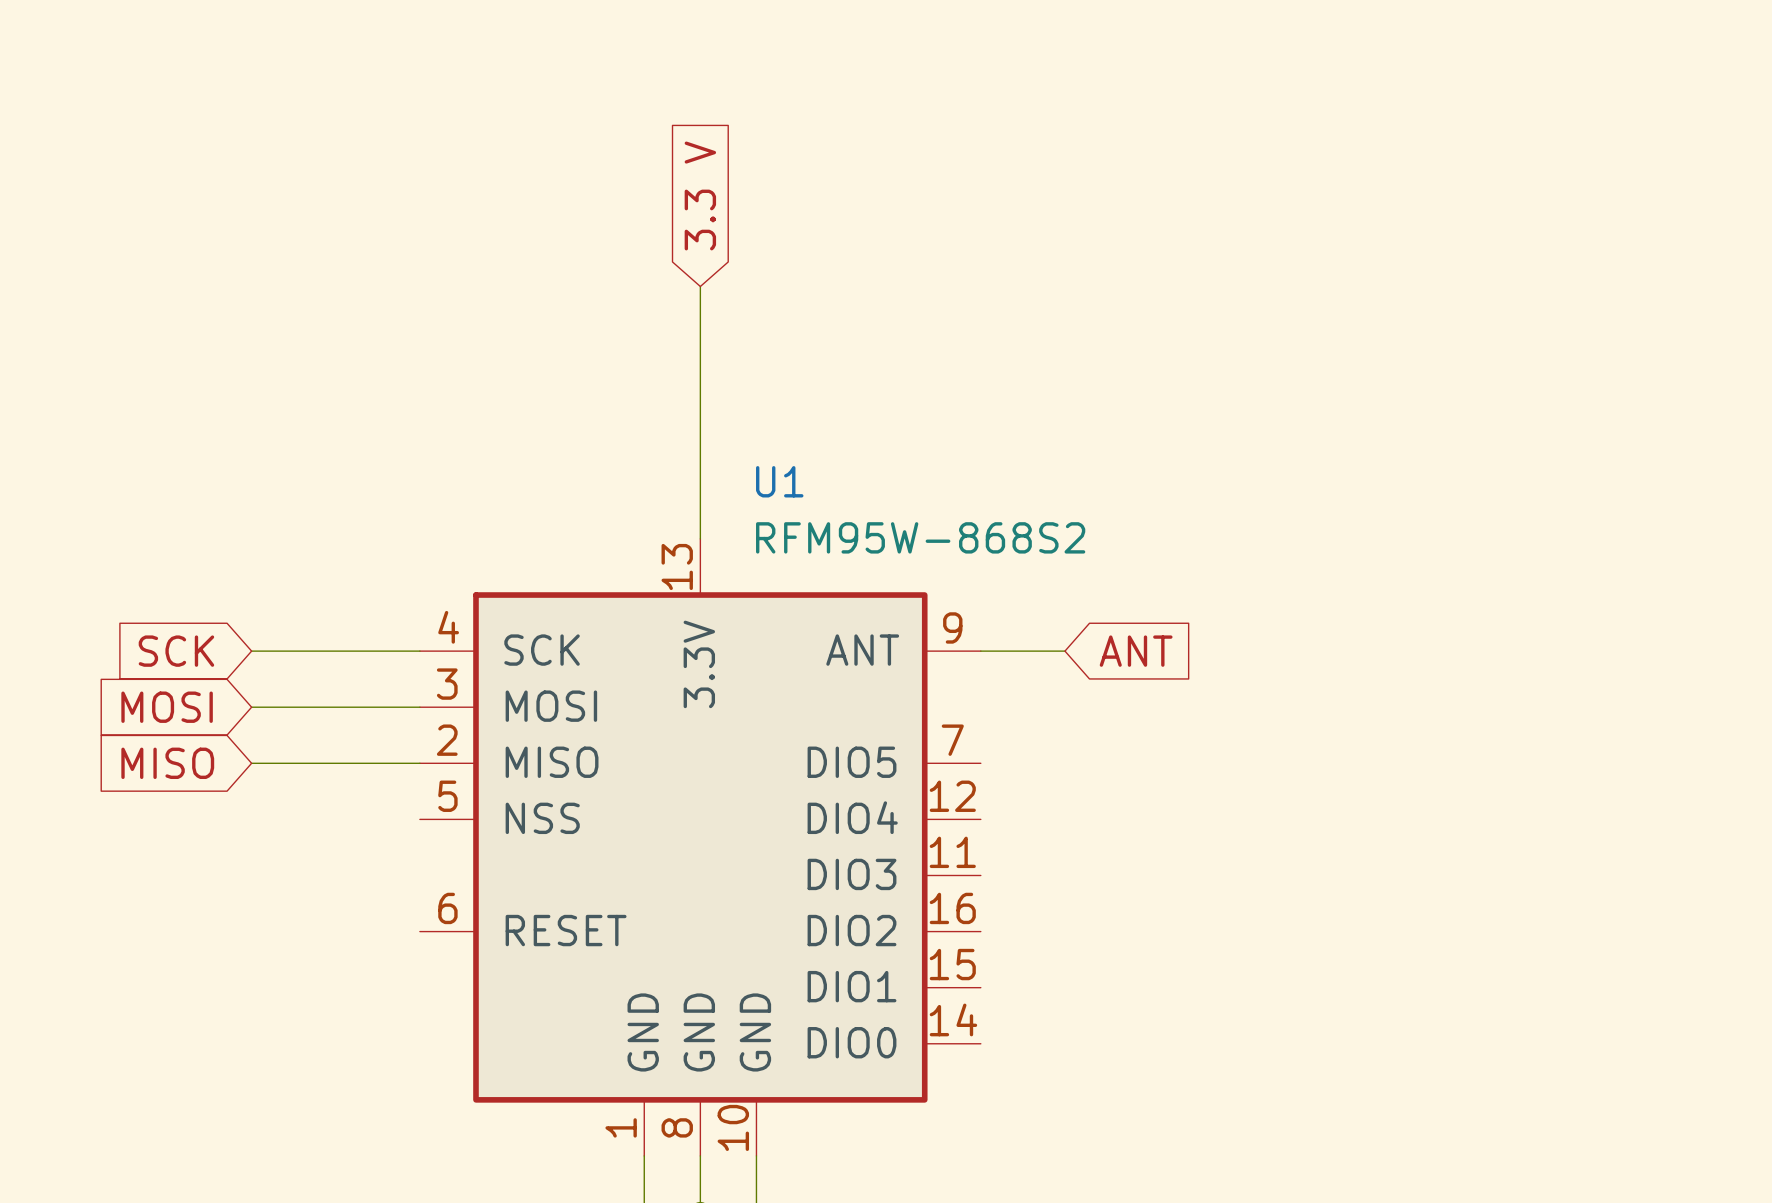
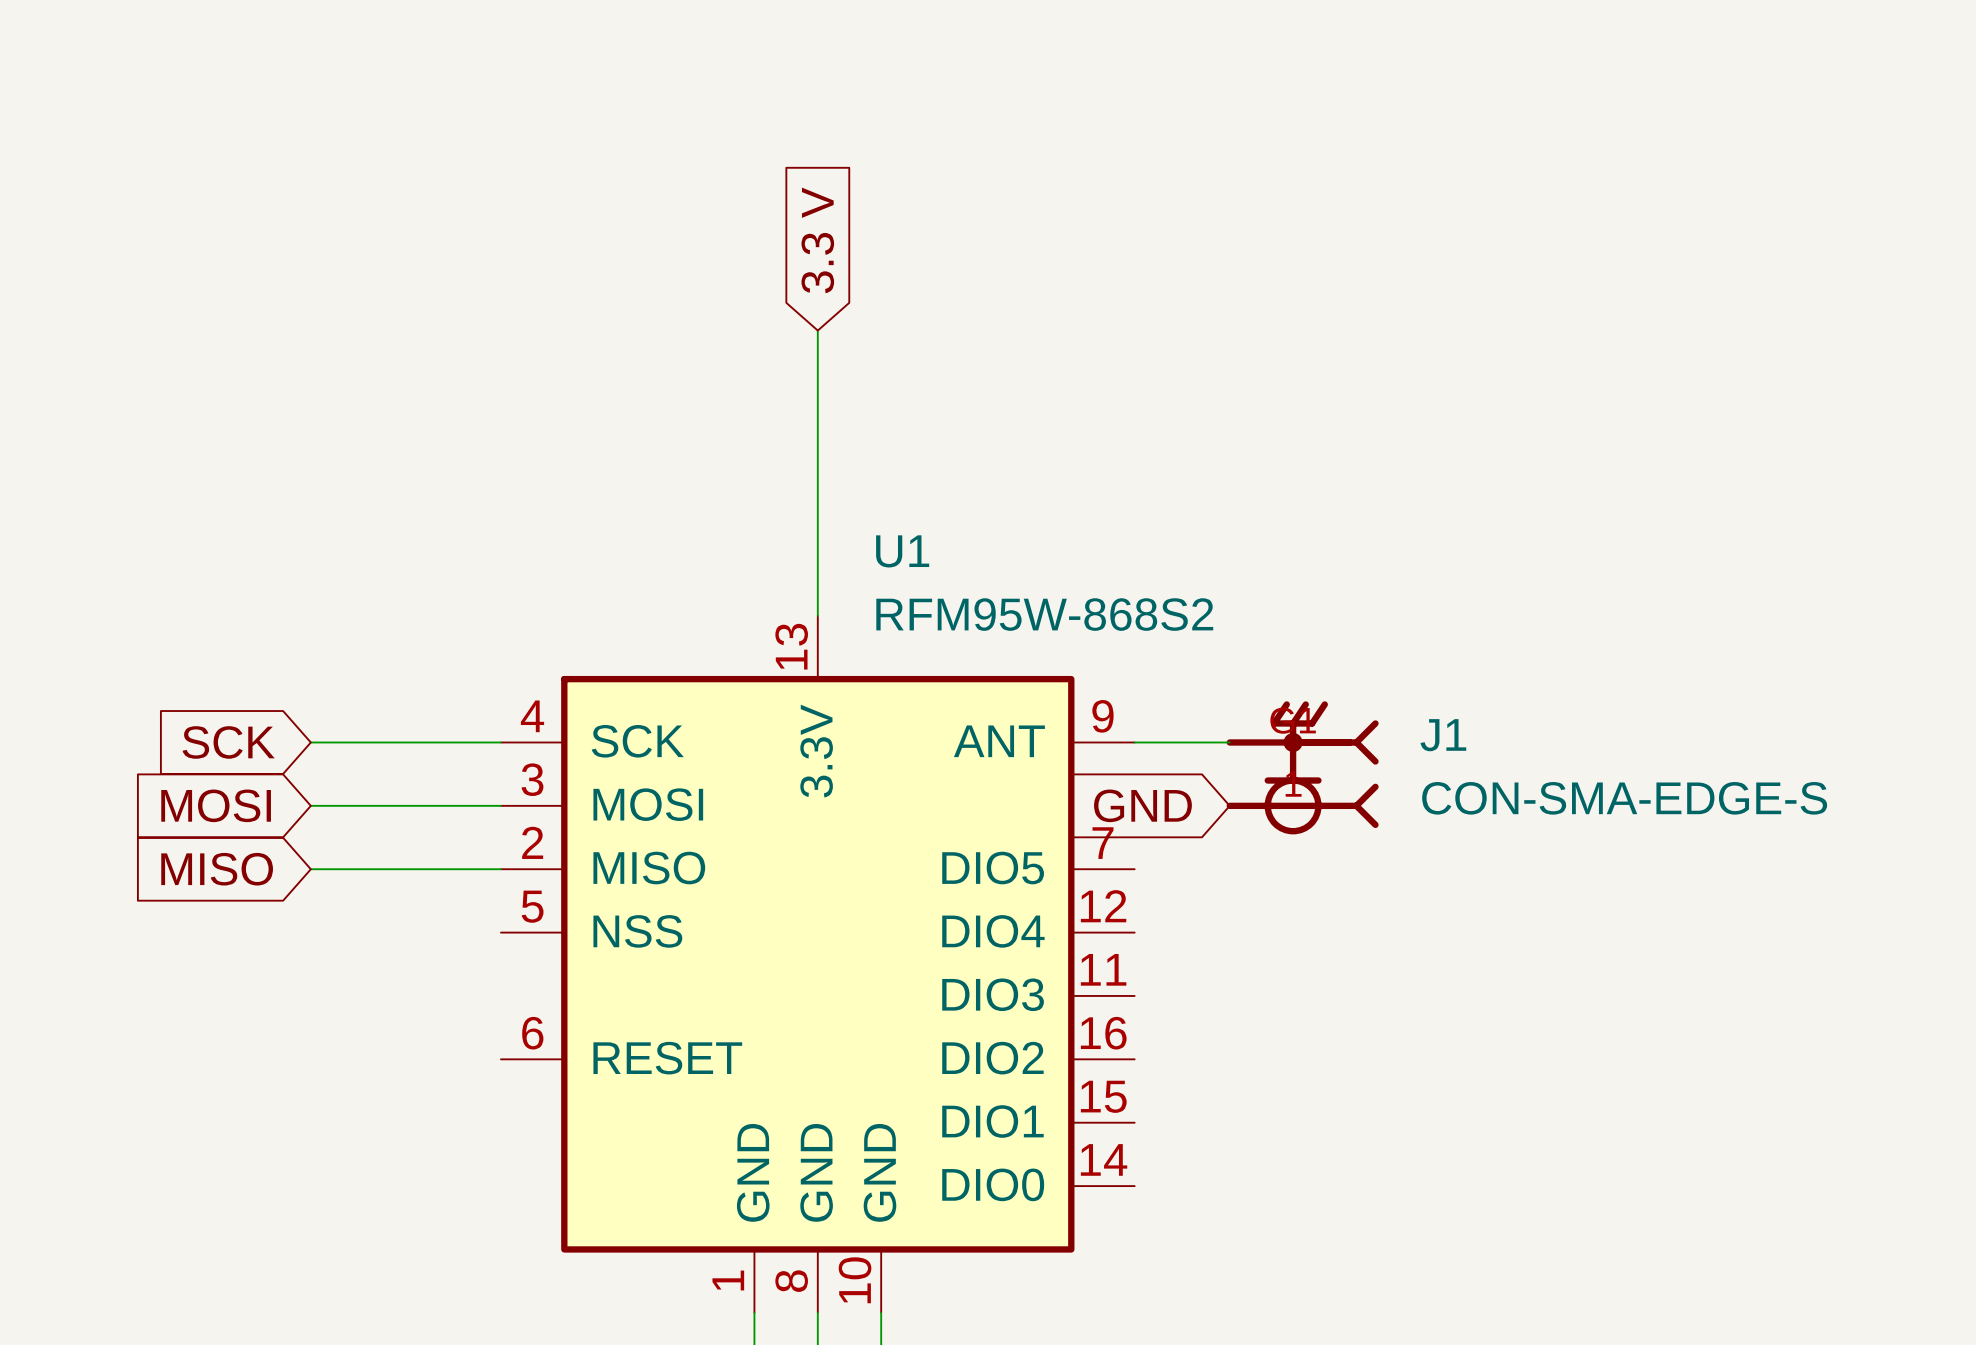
global label: ANT (1136, 651) -> none
J1: none -> CON-SMA-EDGE-S (1302, 767)
global label: none -> GND (1142, 805)

